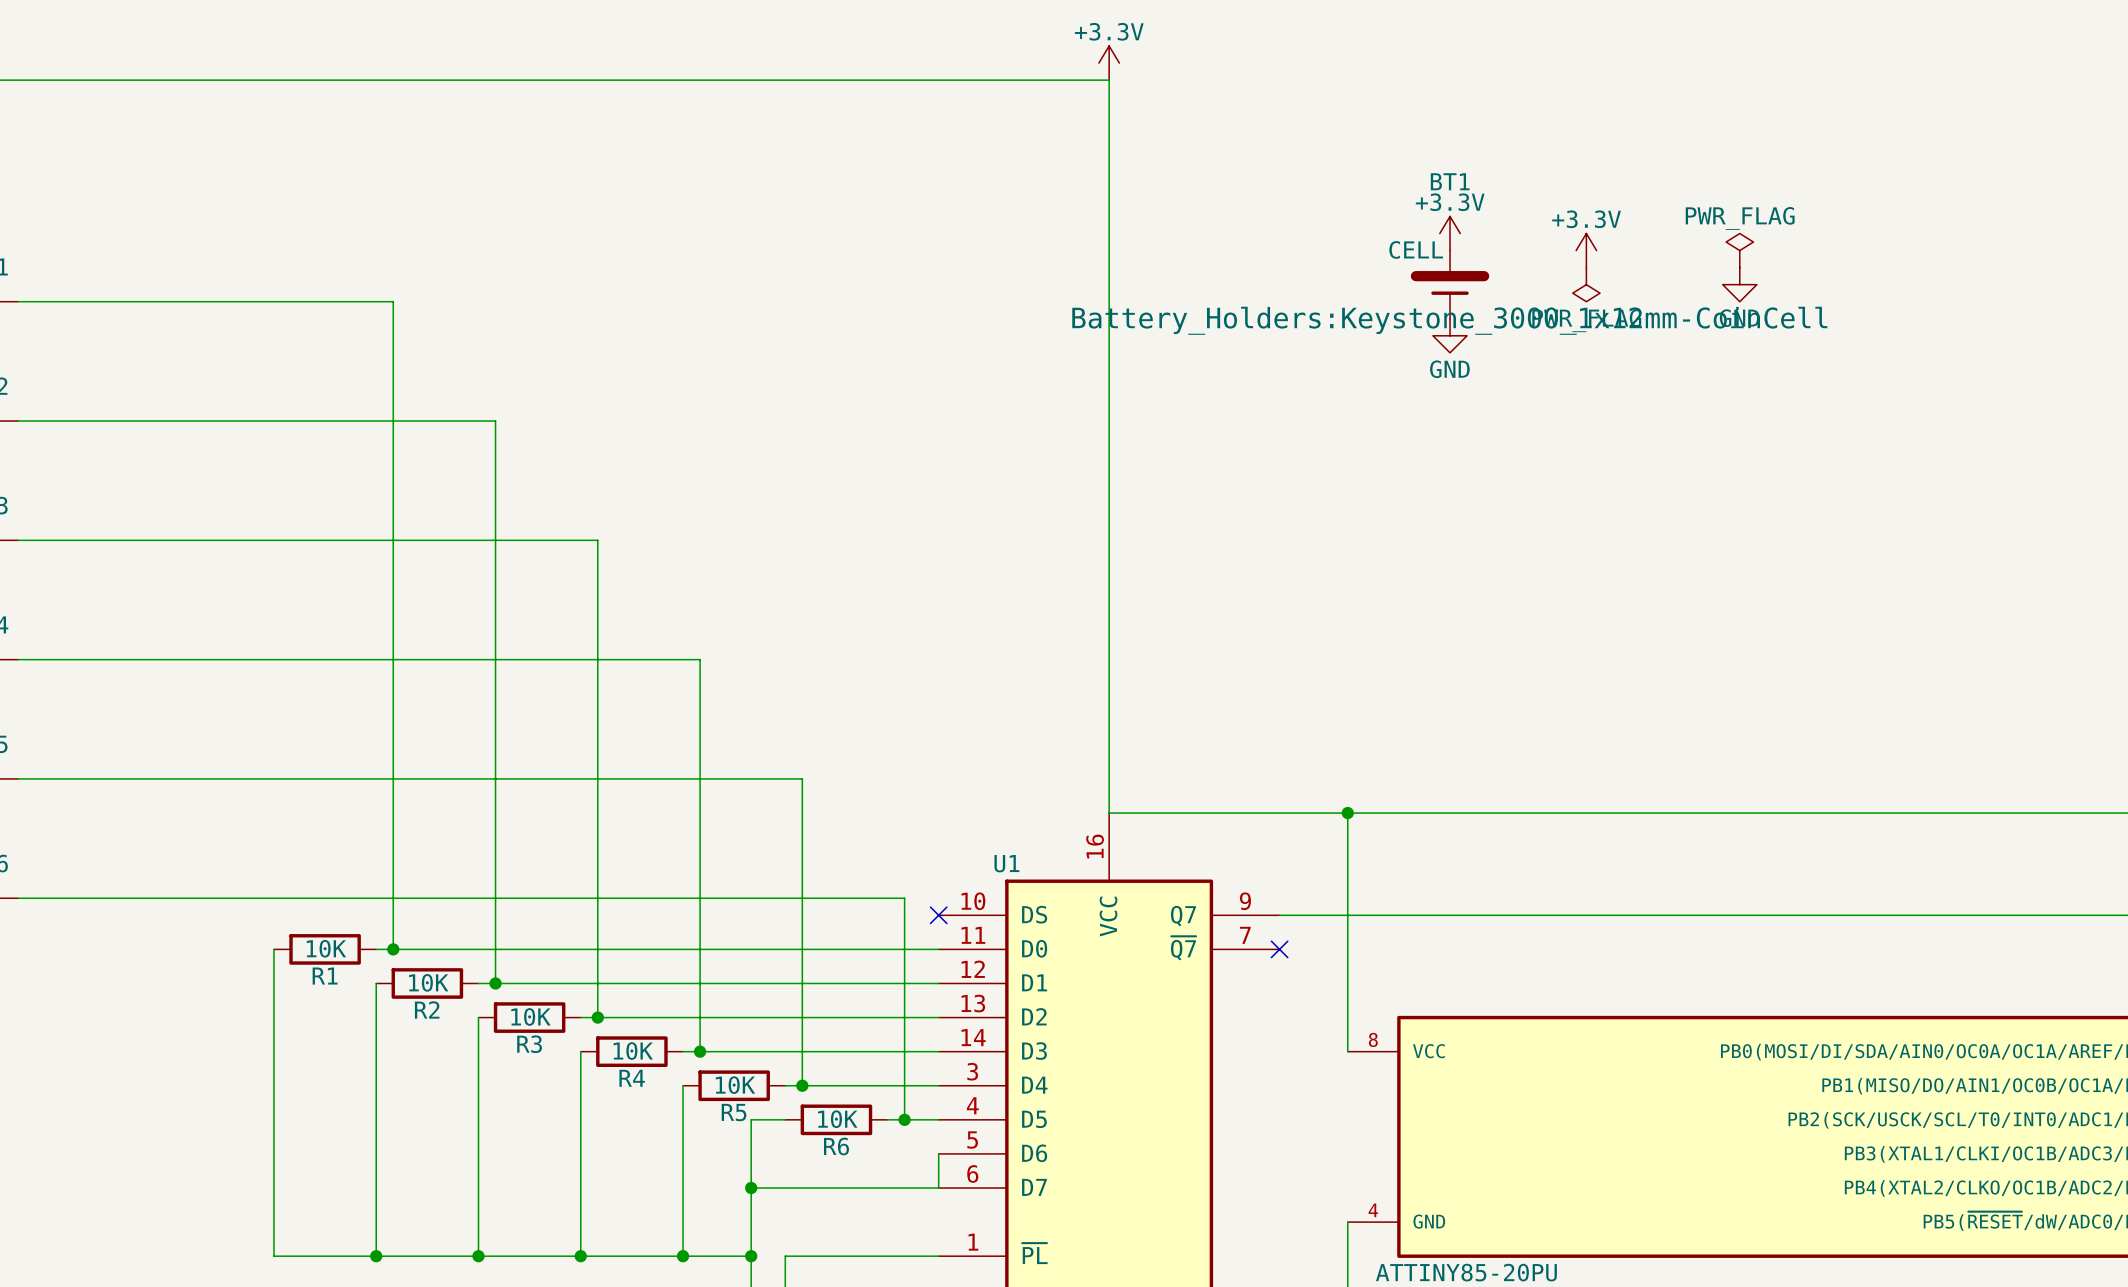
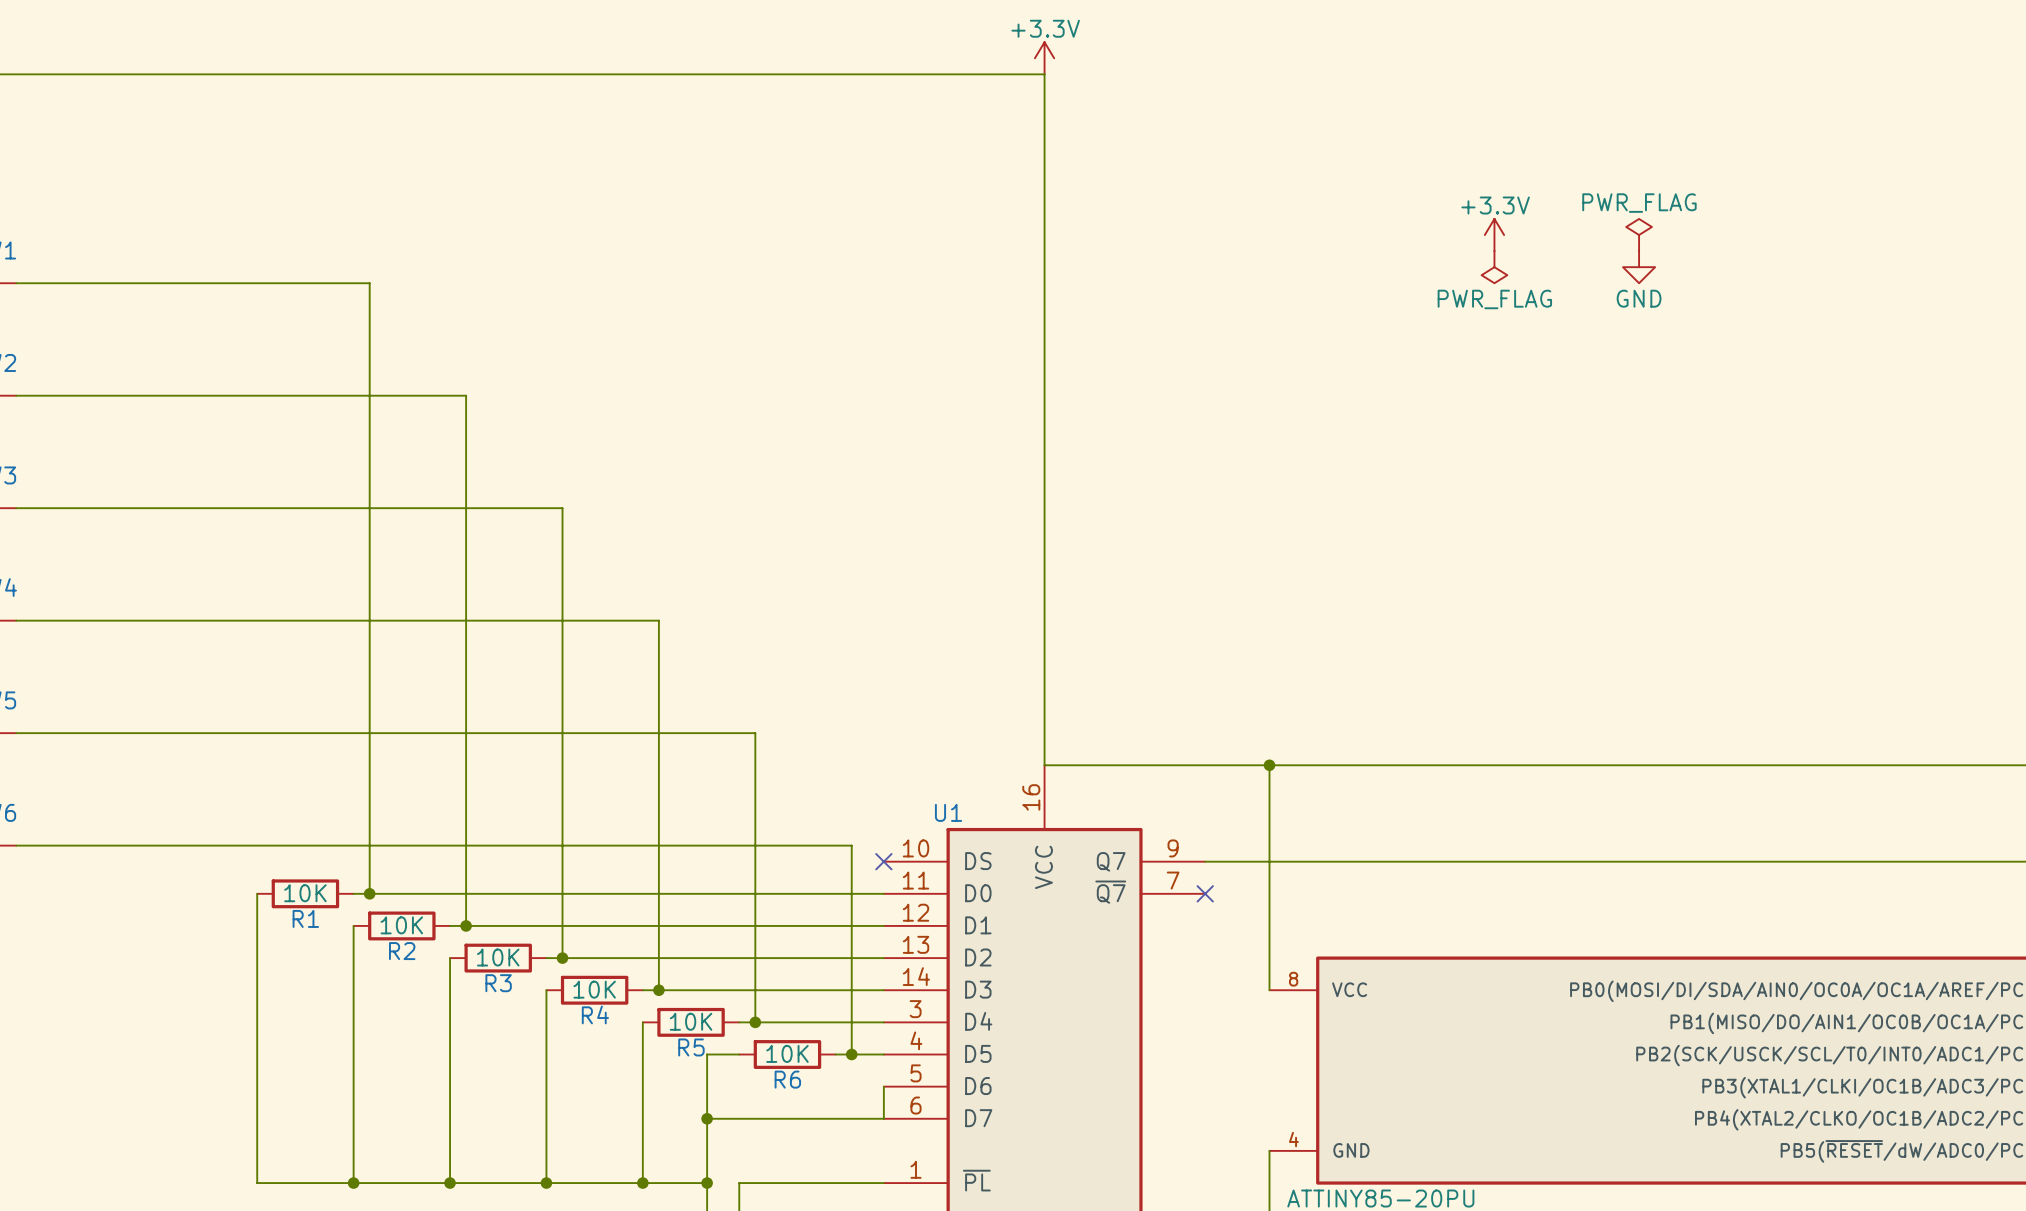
power symbol: +3.3V (1450, 233) -> none
BT1: CELL (1450, 284) -> none
power symbol: GND (1450, 335) -> none

